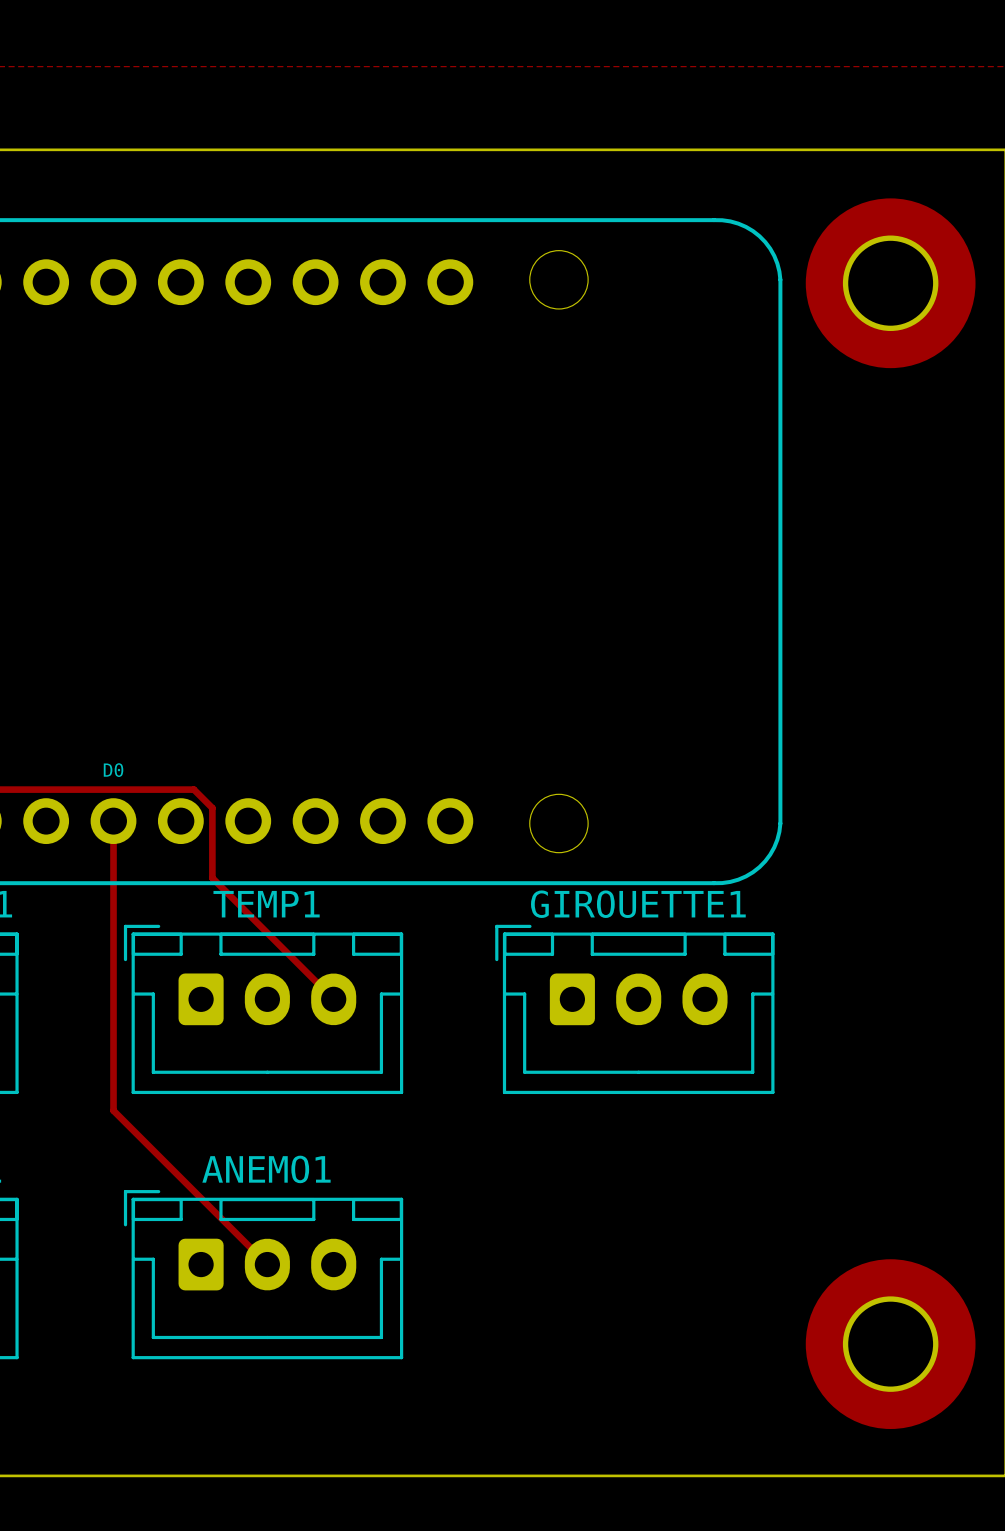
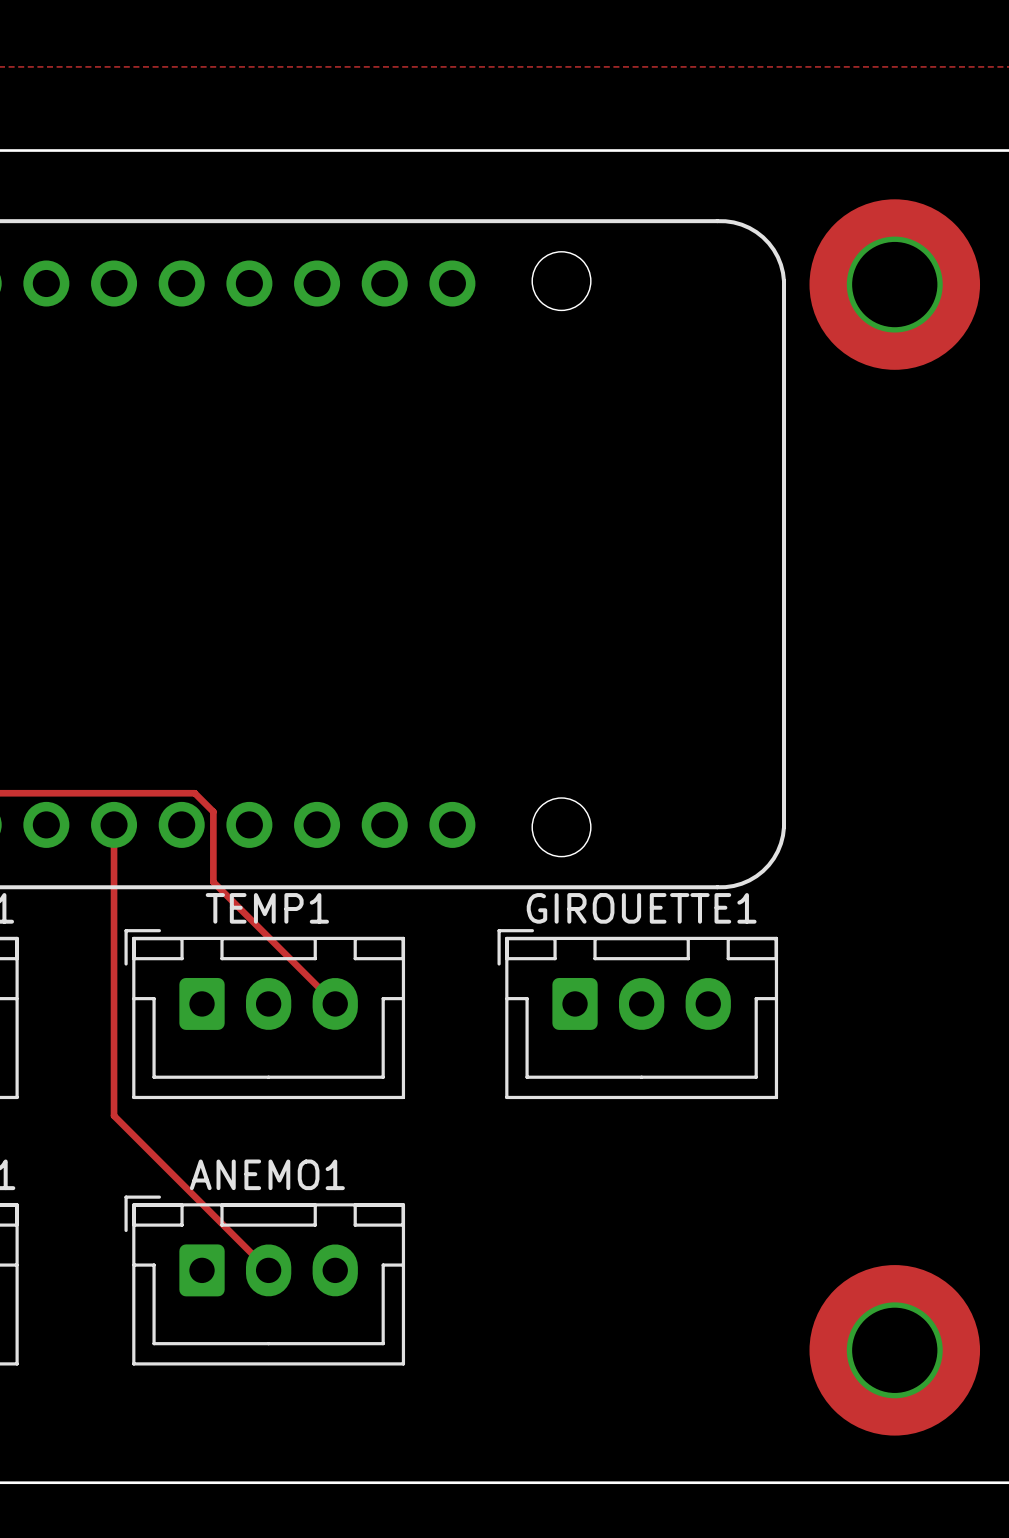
part text: D0 (113, 770) -> none

